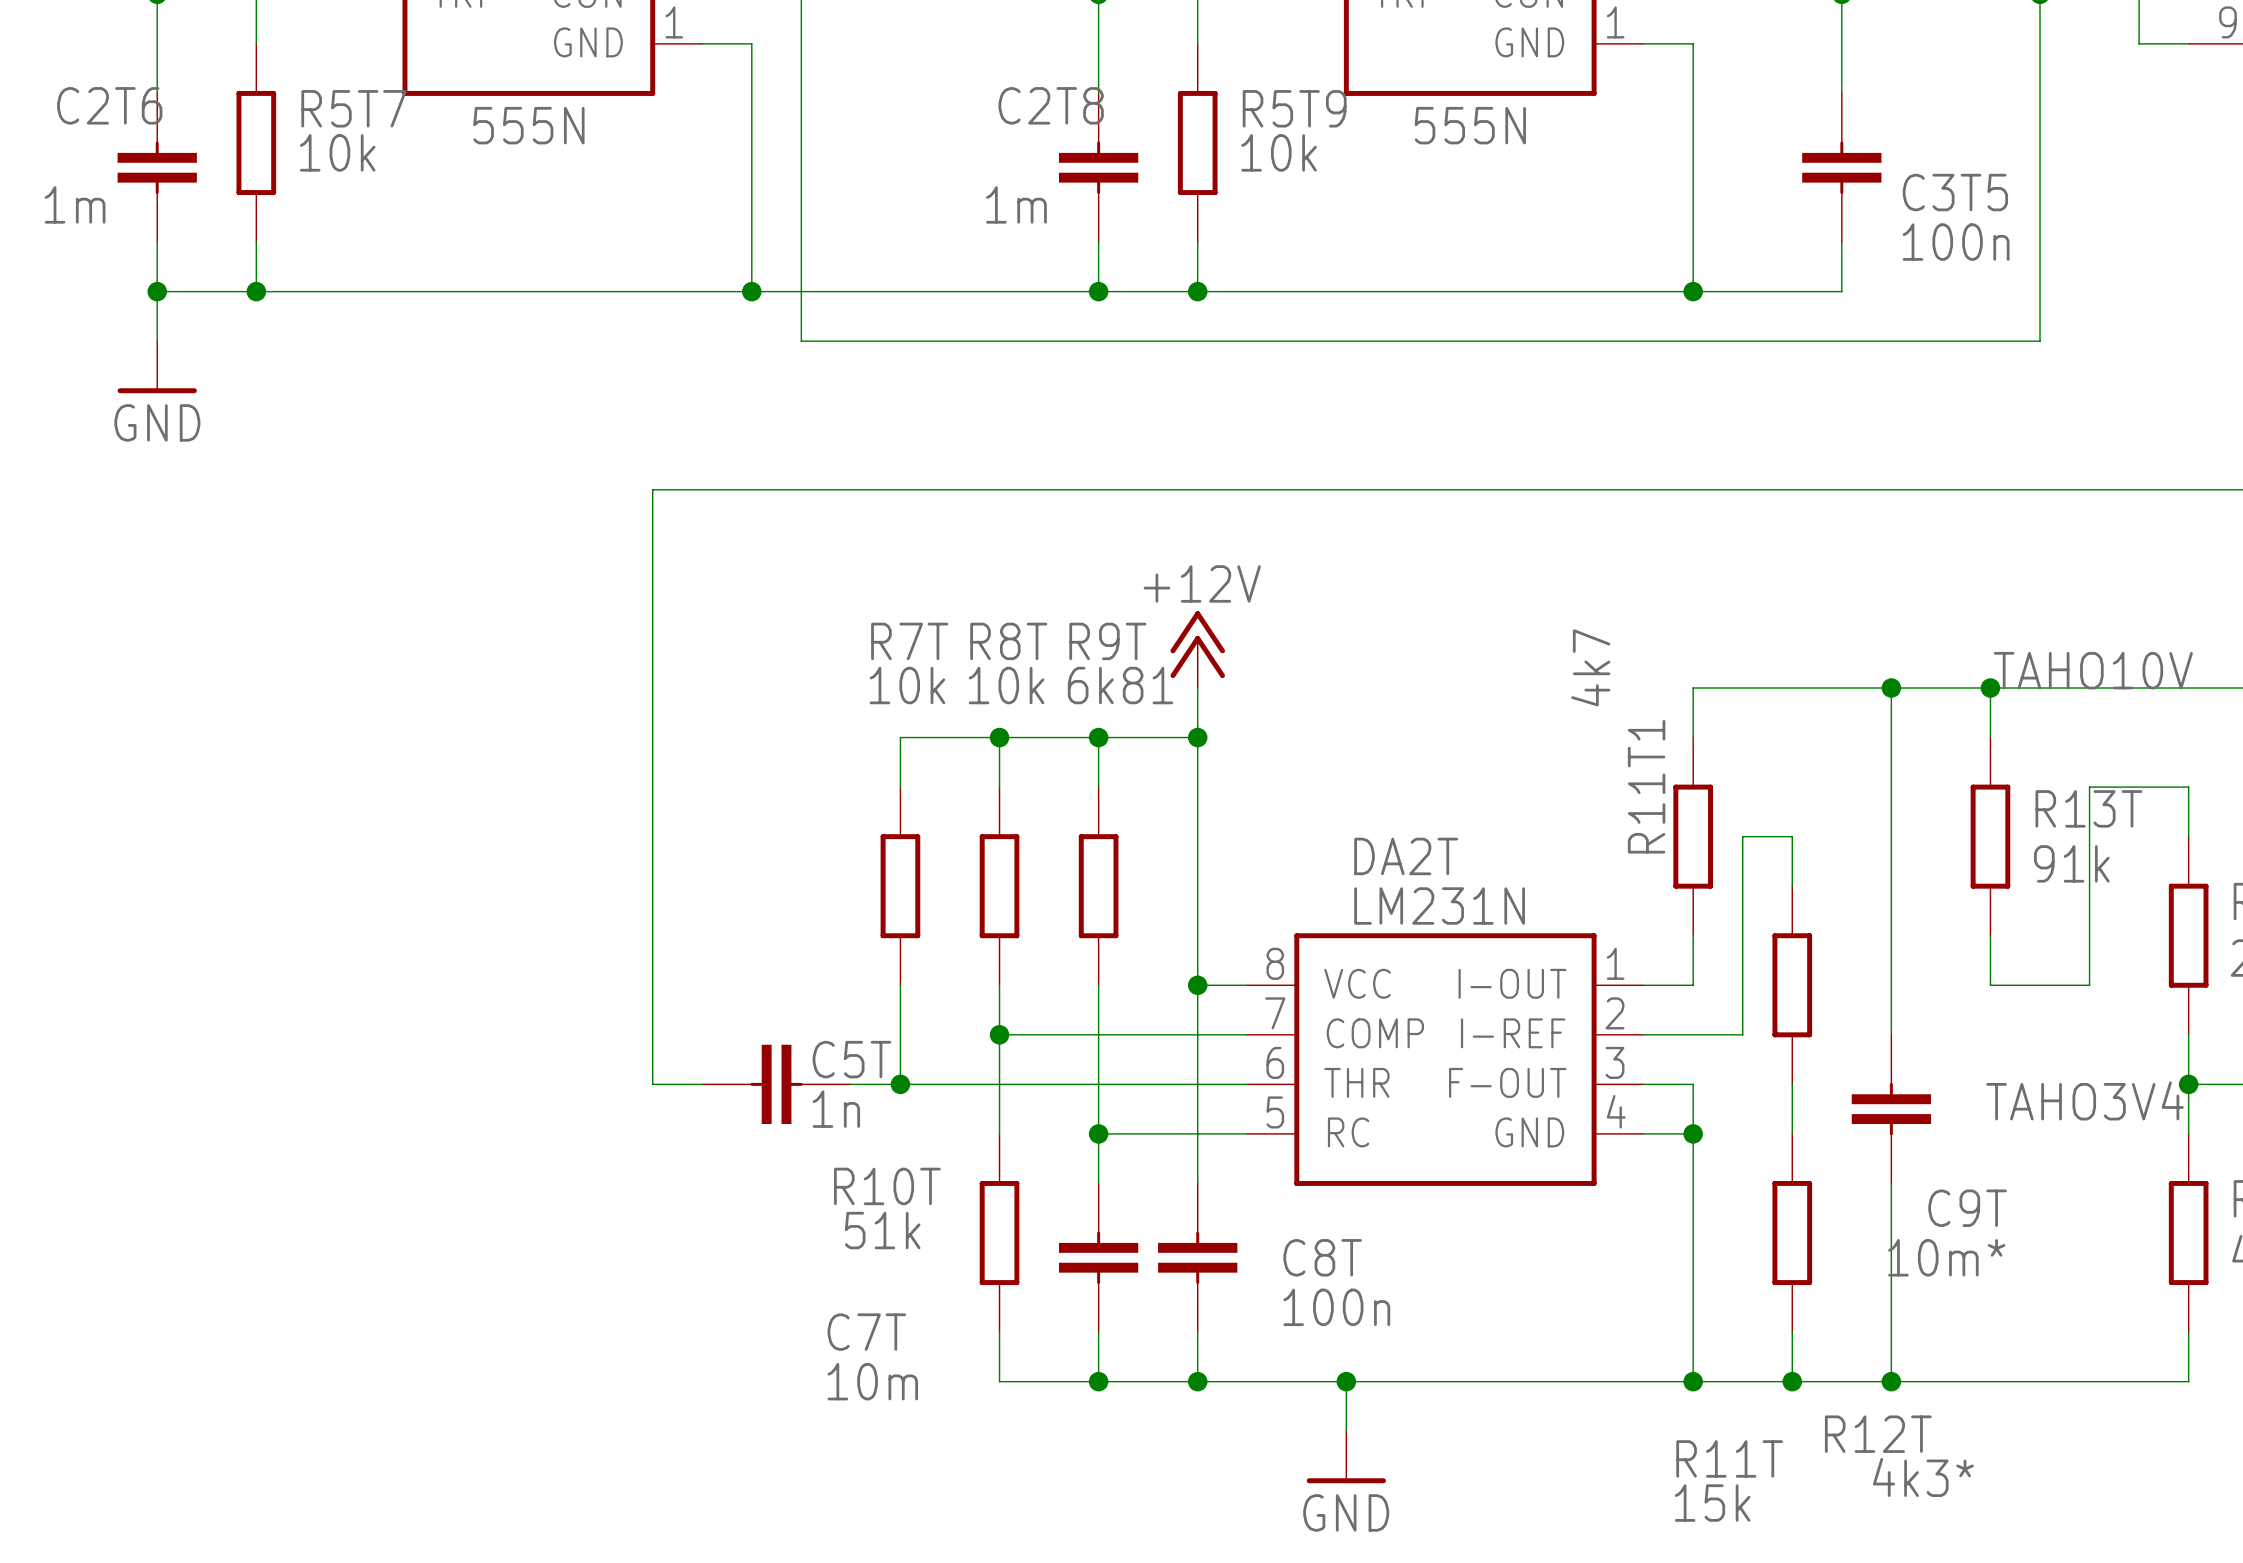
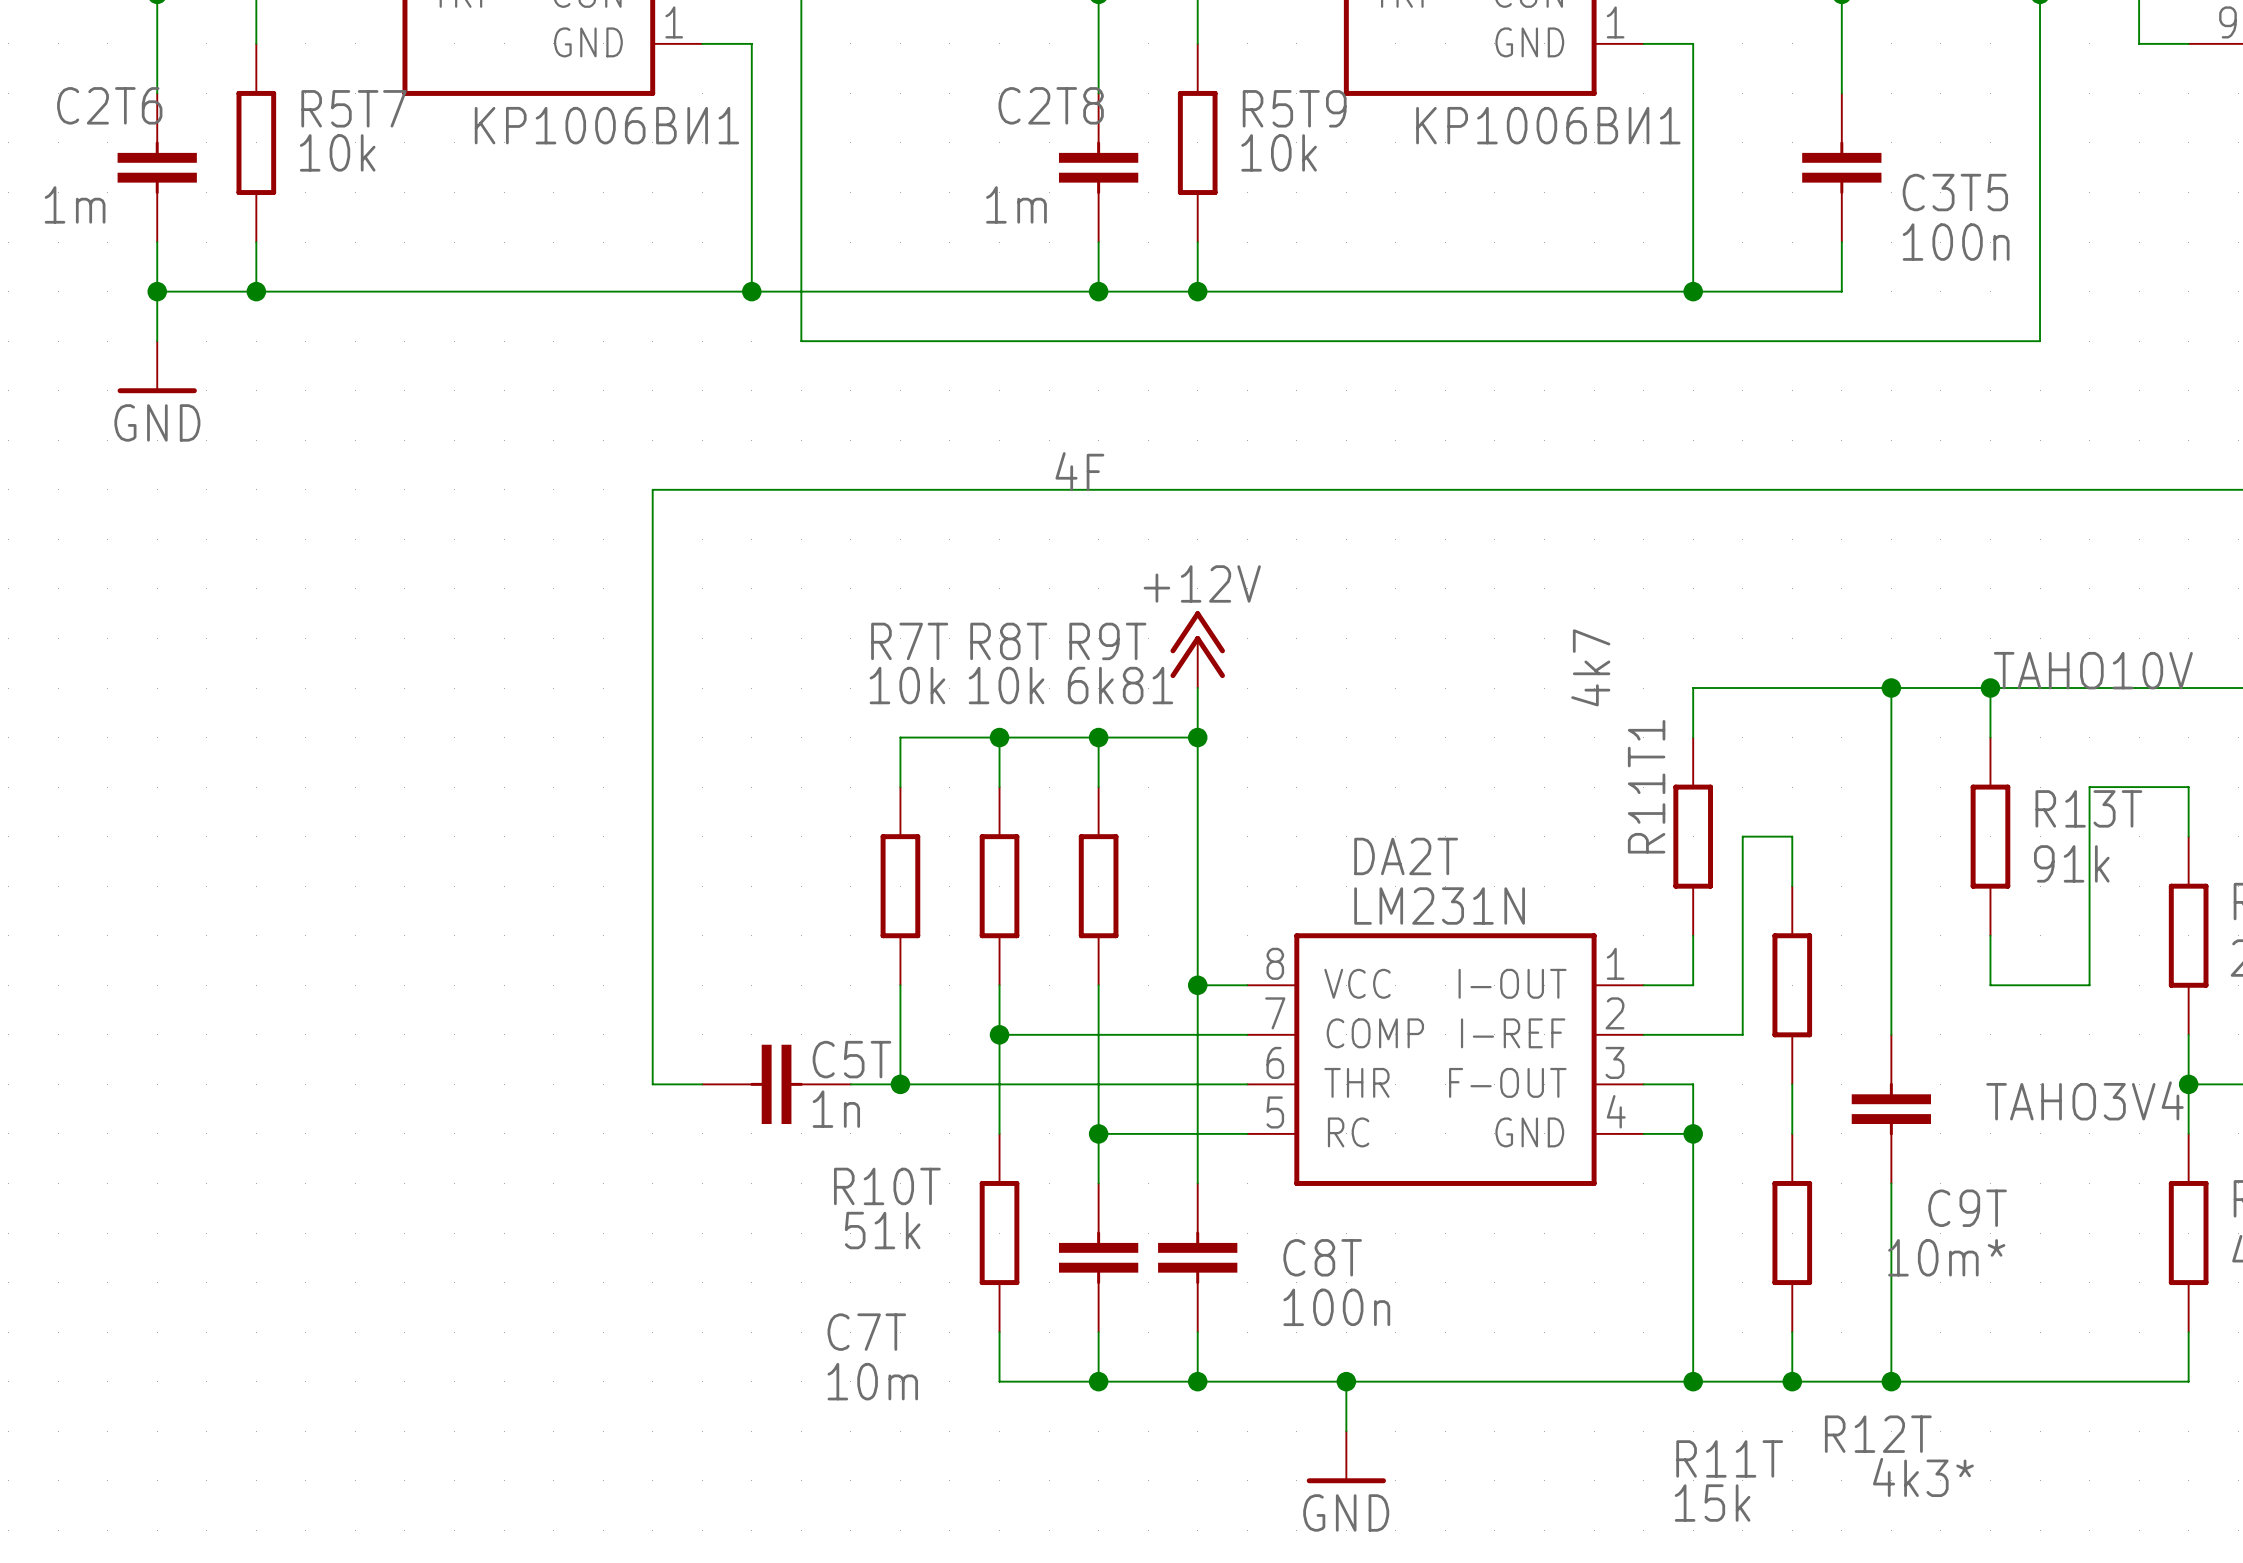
part value: 555N (528, 125) -> КР1006ВИ1 (606, 125)
part value: 555N (1470, 125) -> КР1006ВИ1 (1548, 125)
label: none -> 4F (1079, 471)

